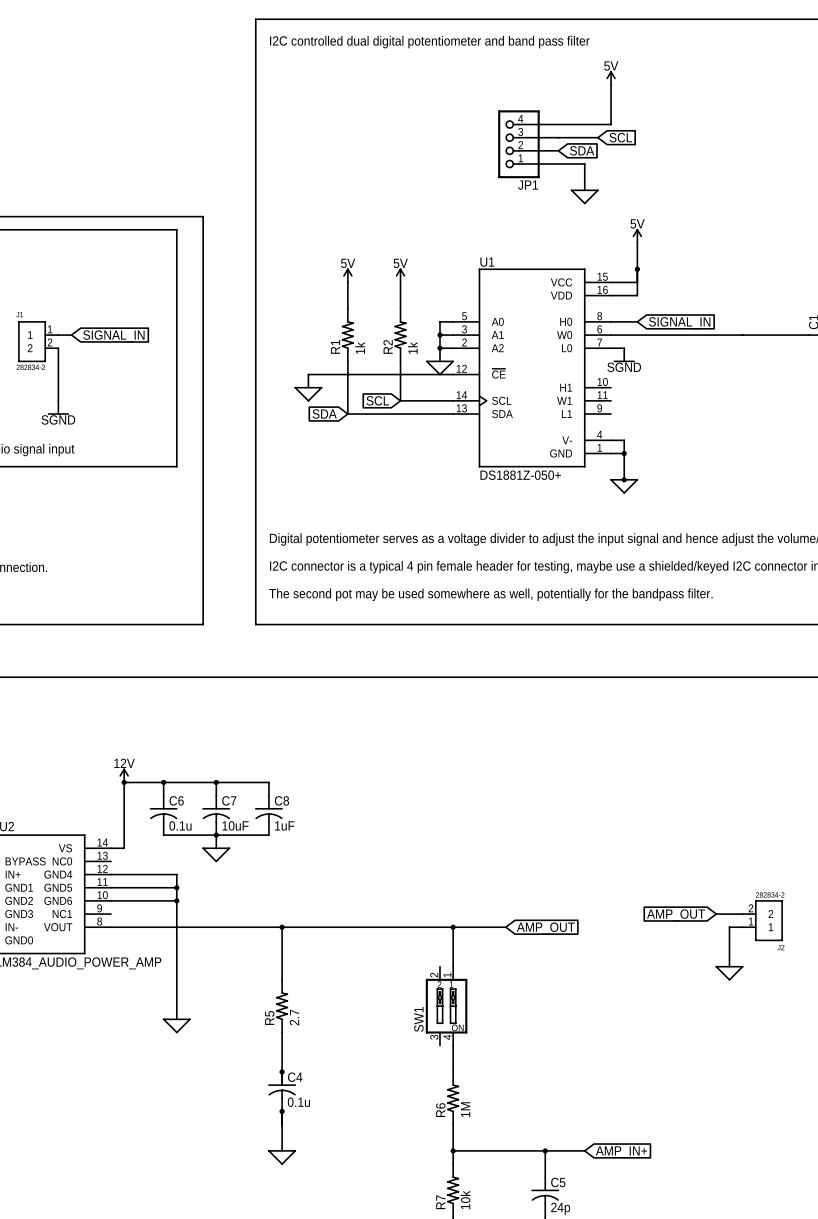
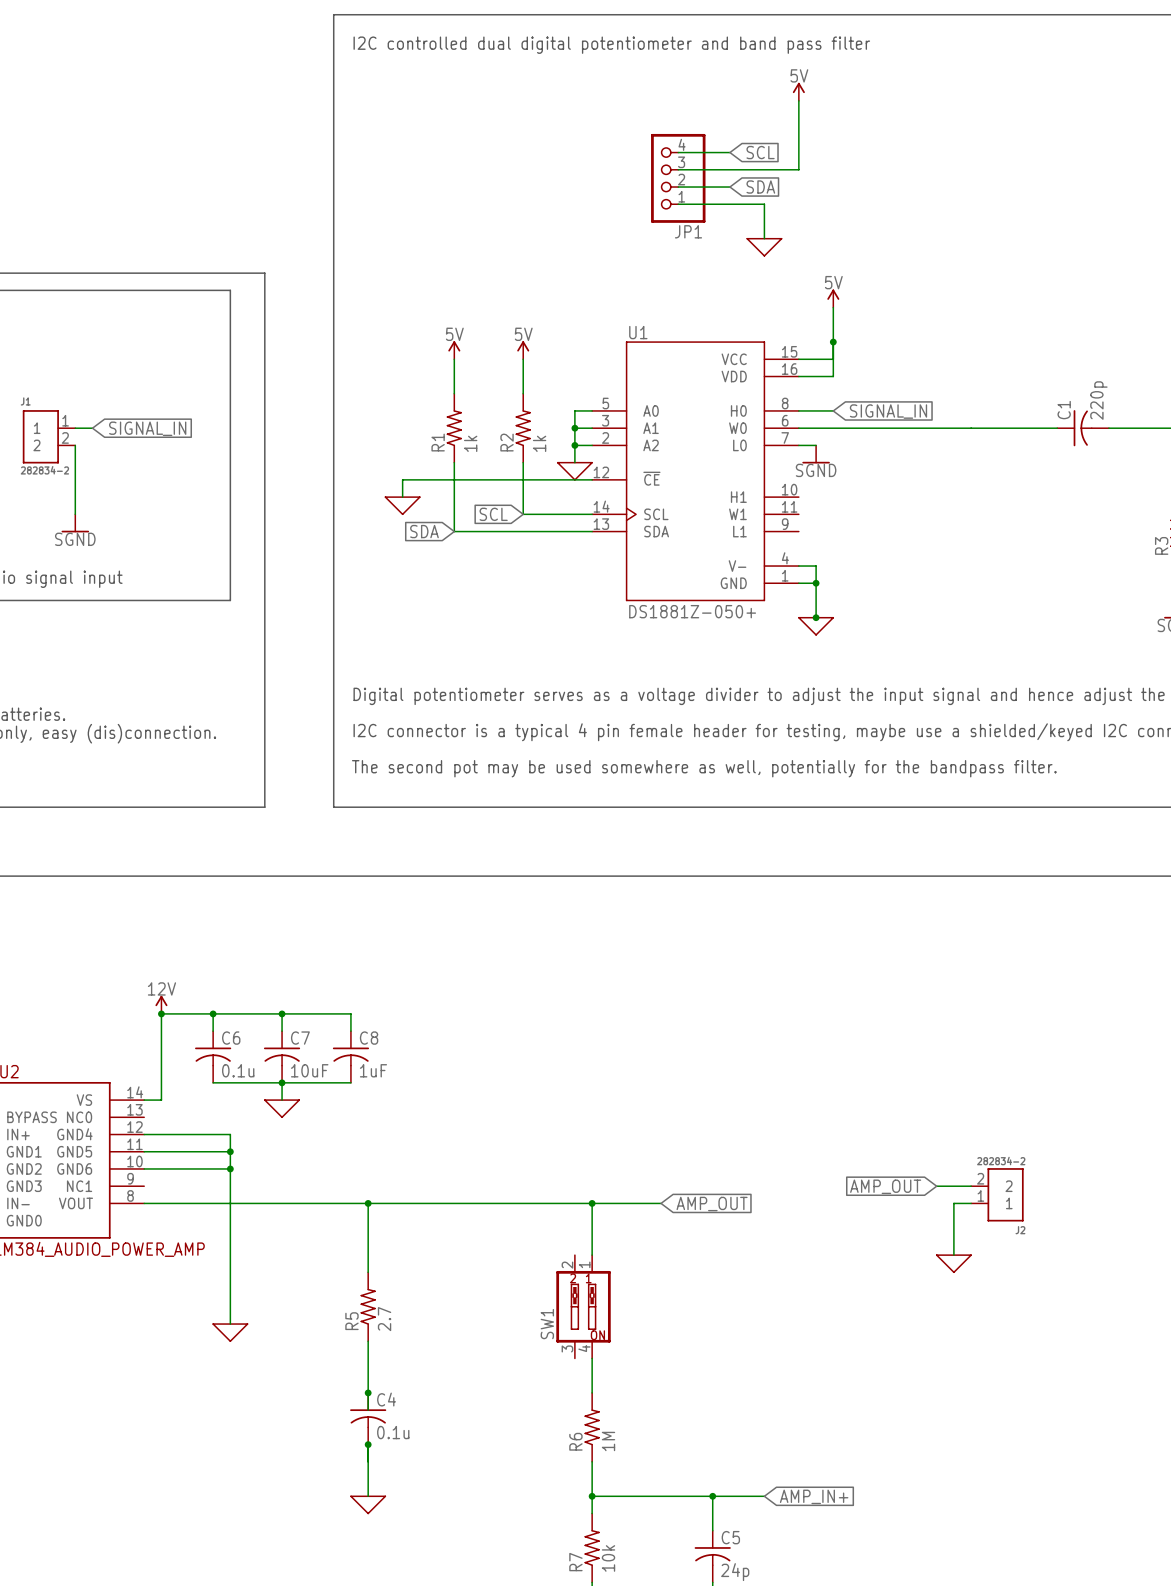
wire: (558, 124) (611, 124) -> (781, 169) (798, 169) (798, 152)
global label position: SCL (620, 137) -> SCL (760, 152)

